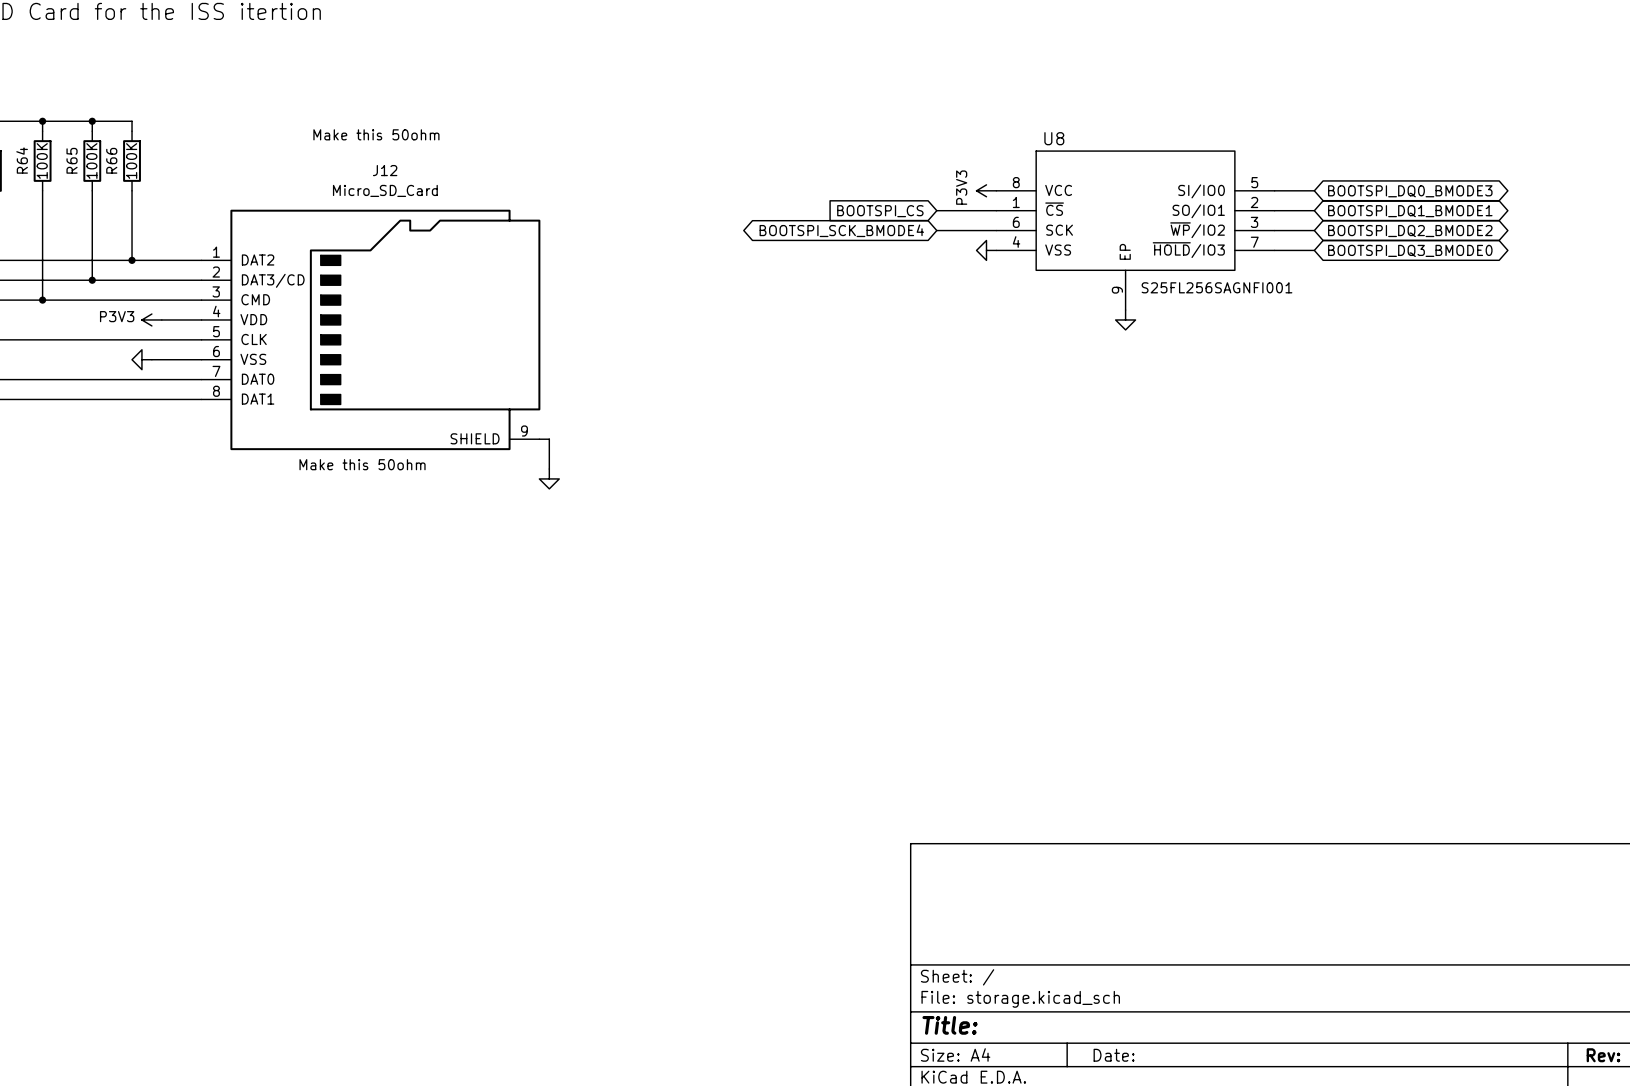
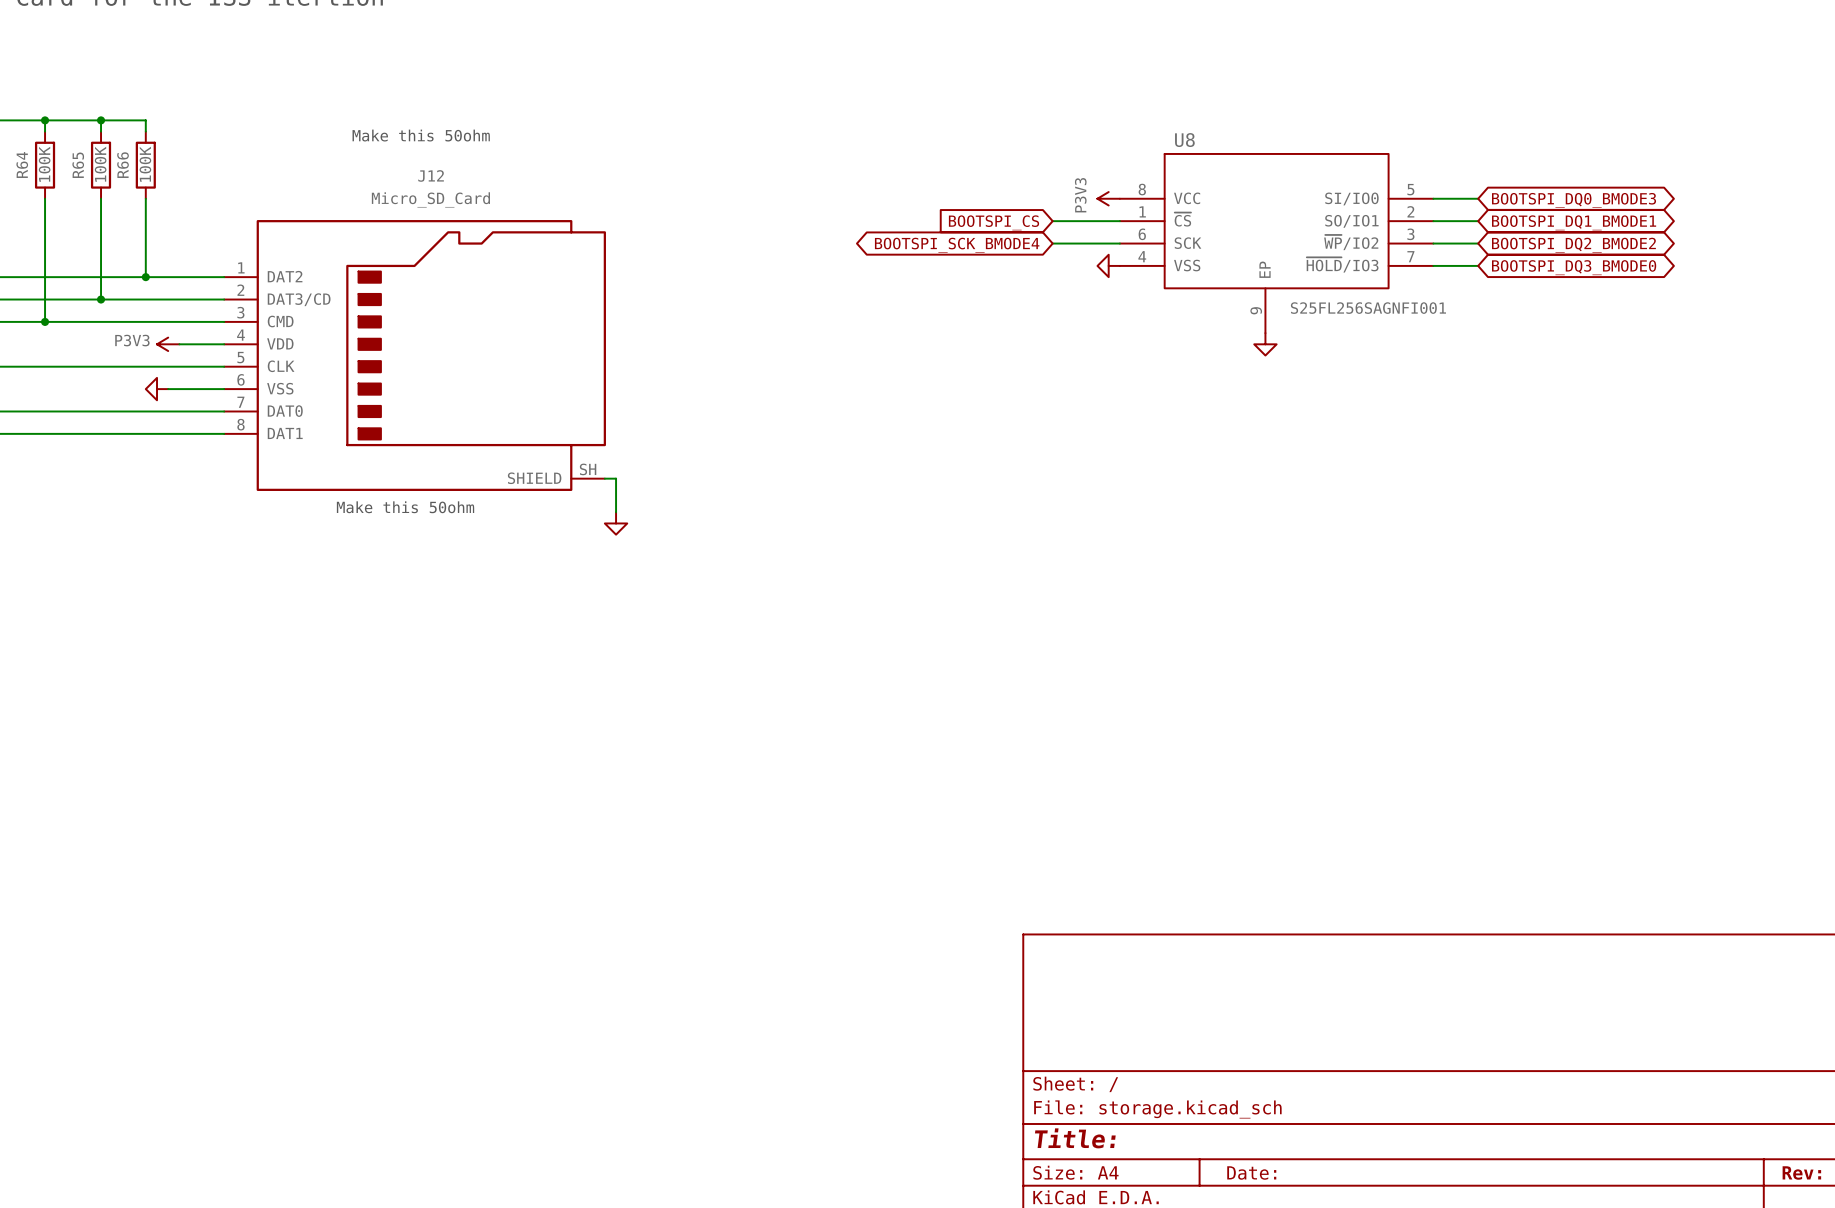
J12 pin number: 9 (524, 431) -> SH (588, 469)

